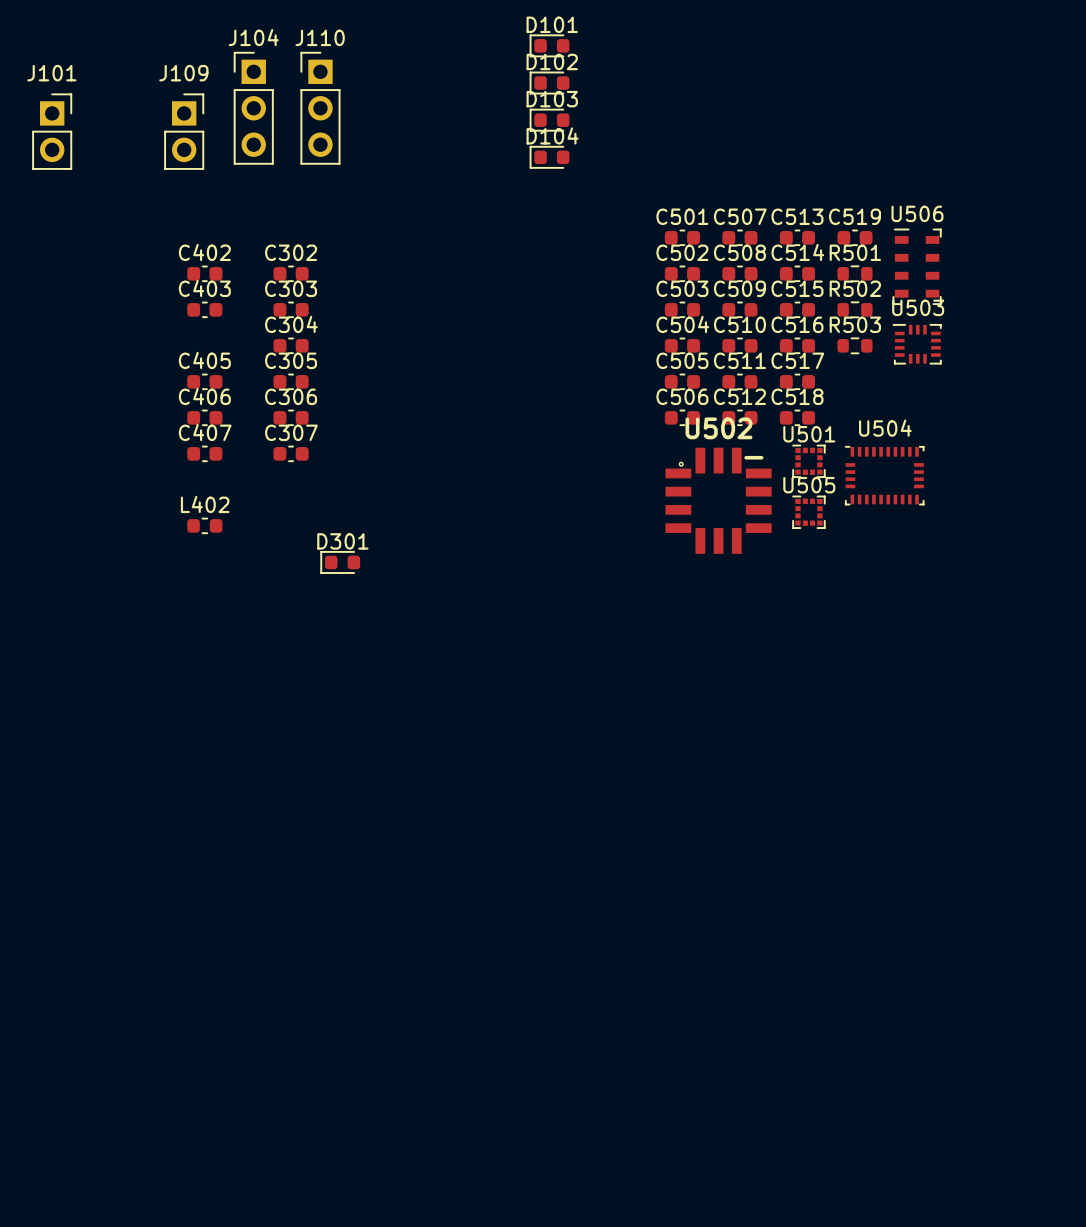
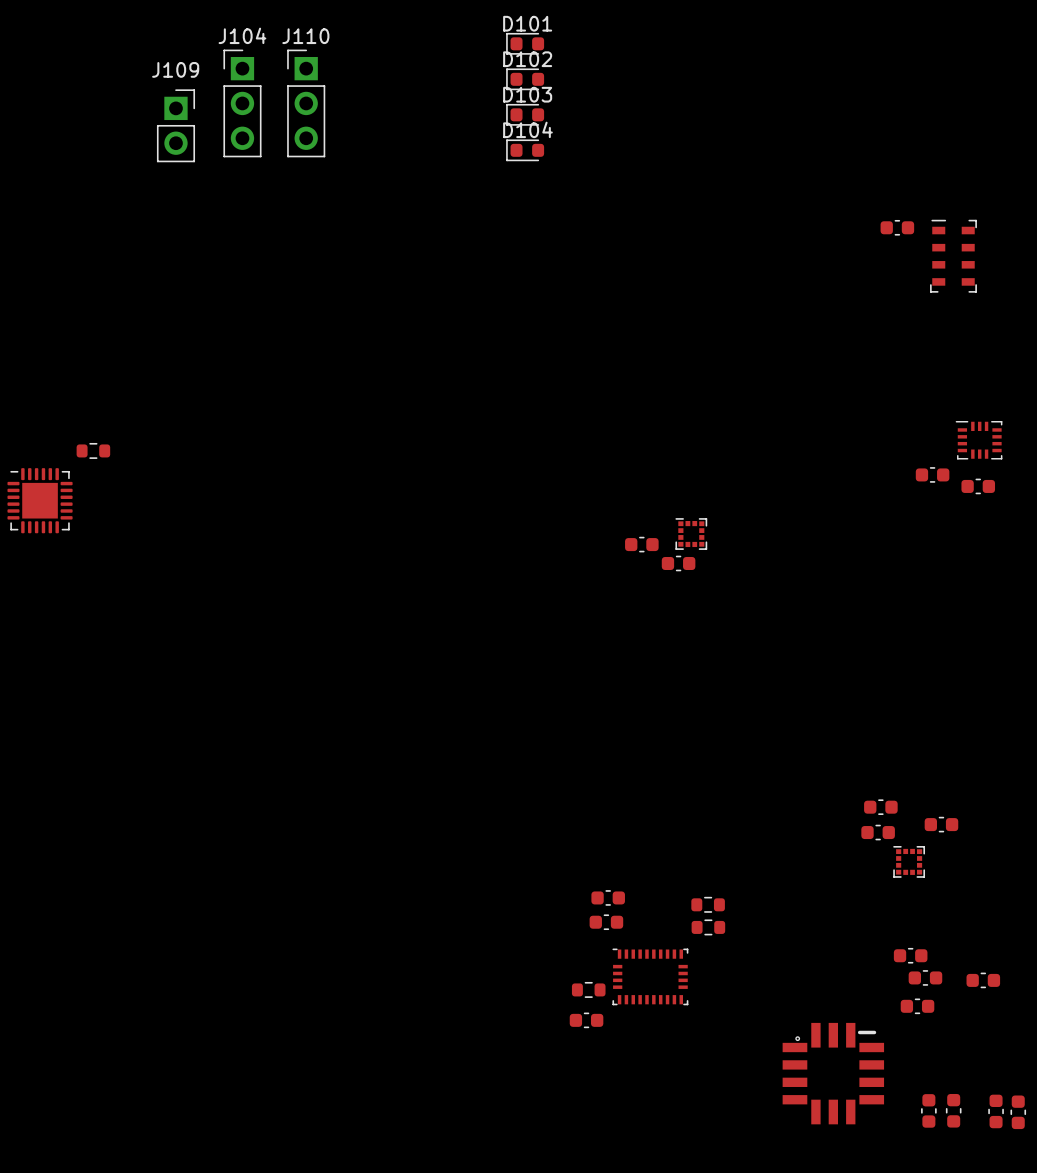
J101: (52, 131) -> none
C501: (682, 237) -> none
C507: (739, 237) -> none
C513: (797, 237) -> none
C519: (854, 237) -> none
part: none -> (897, 227)
U506: (917, 266) -> none
part: none -> (953, 256)
C402: (204, 273) -> none
C302: (291, 273) -> none
C502: (682, 273) -> none
C508: (739, 273) -> none
C514: (797, 273) -> none
R501: (854, 273) -> none
C403: (204, 309) -> none
C303: (291, 309) -> none
C503: (682, 309) -> none
C509: (739, 309) -> none
C515: (797, 309) -> none
R502: (854, 309) -> none
U503: (917, 344) -> none
C304: (291, 345) -> none
C504: (682, 345) -> none
C510: (739, 345) -> none
C516: (797, 345) -> none
R503: (854, 345) -> none
C405: (204, 381) -> none
C305: (291, 381) -> none
C505: (682, 381) -> none
C511: (739, 381) -> none
C517: (797, 381) -> none
C406: (204, 417) -> none
C306: (291, 417) -> none
C506: (682, 417) -> none
C512: (739, 417) -> none
C518: (797, 417) -> none
C407: (204, 453) -> none
C307: (291, 453) -> none
part: none -> (979, 440)
U501: (808, 461) -> none
part: none -> (93, 450)
U504: (884, 475) -> none
part: none -> (932, 474)
U502: (718, 500) -> none
part: none -> (978, 486)
U505: (808, 512) -> none
part: none -> (40, 500)
L402: (204, 525) -> none
part: none -> (691, 534)
D301: (340, 562) -> none
part: none -> (641, 544)
part: none -> (678, 563)
part: none -> (880, 807)
part: none -> (941, 824)
part: none -> (878, 832)
part: none -> (909, 861)
part: none -> (608, 897)
part: none -> (708, 904)
part: none -> (606, 922)
part: none -> (708, 927)
part: none -> (910, 955)
part: none -> (650, 976)
part: none -> (925, 977)
part: none -> (983, 980)
part: none -> (588, 989)
part: none -> (917, 1006)
part: none -> (586, 1020)
part: none -> (833, 1073)
part: none -> (928, 1110)
part: none -> (953, 1110)
part: none -> (996, 1111)
part: none -> (1018, 1112)

